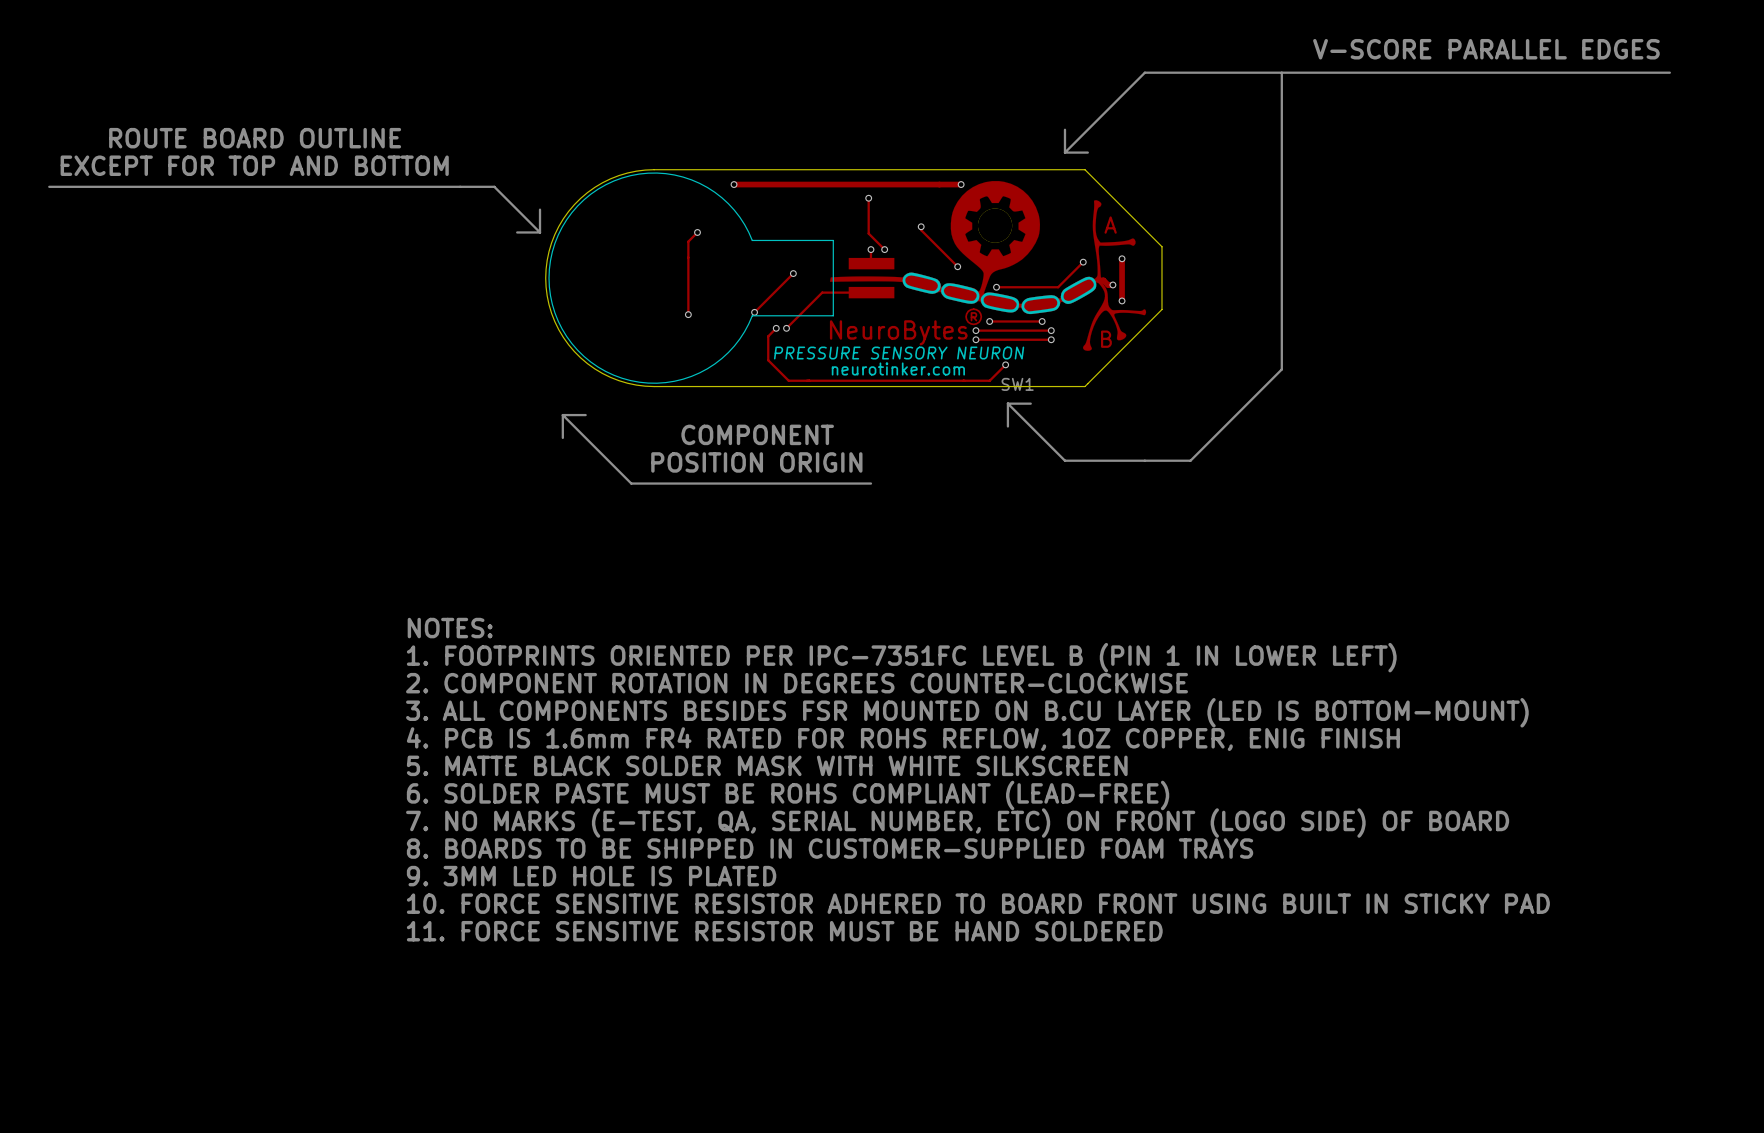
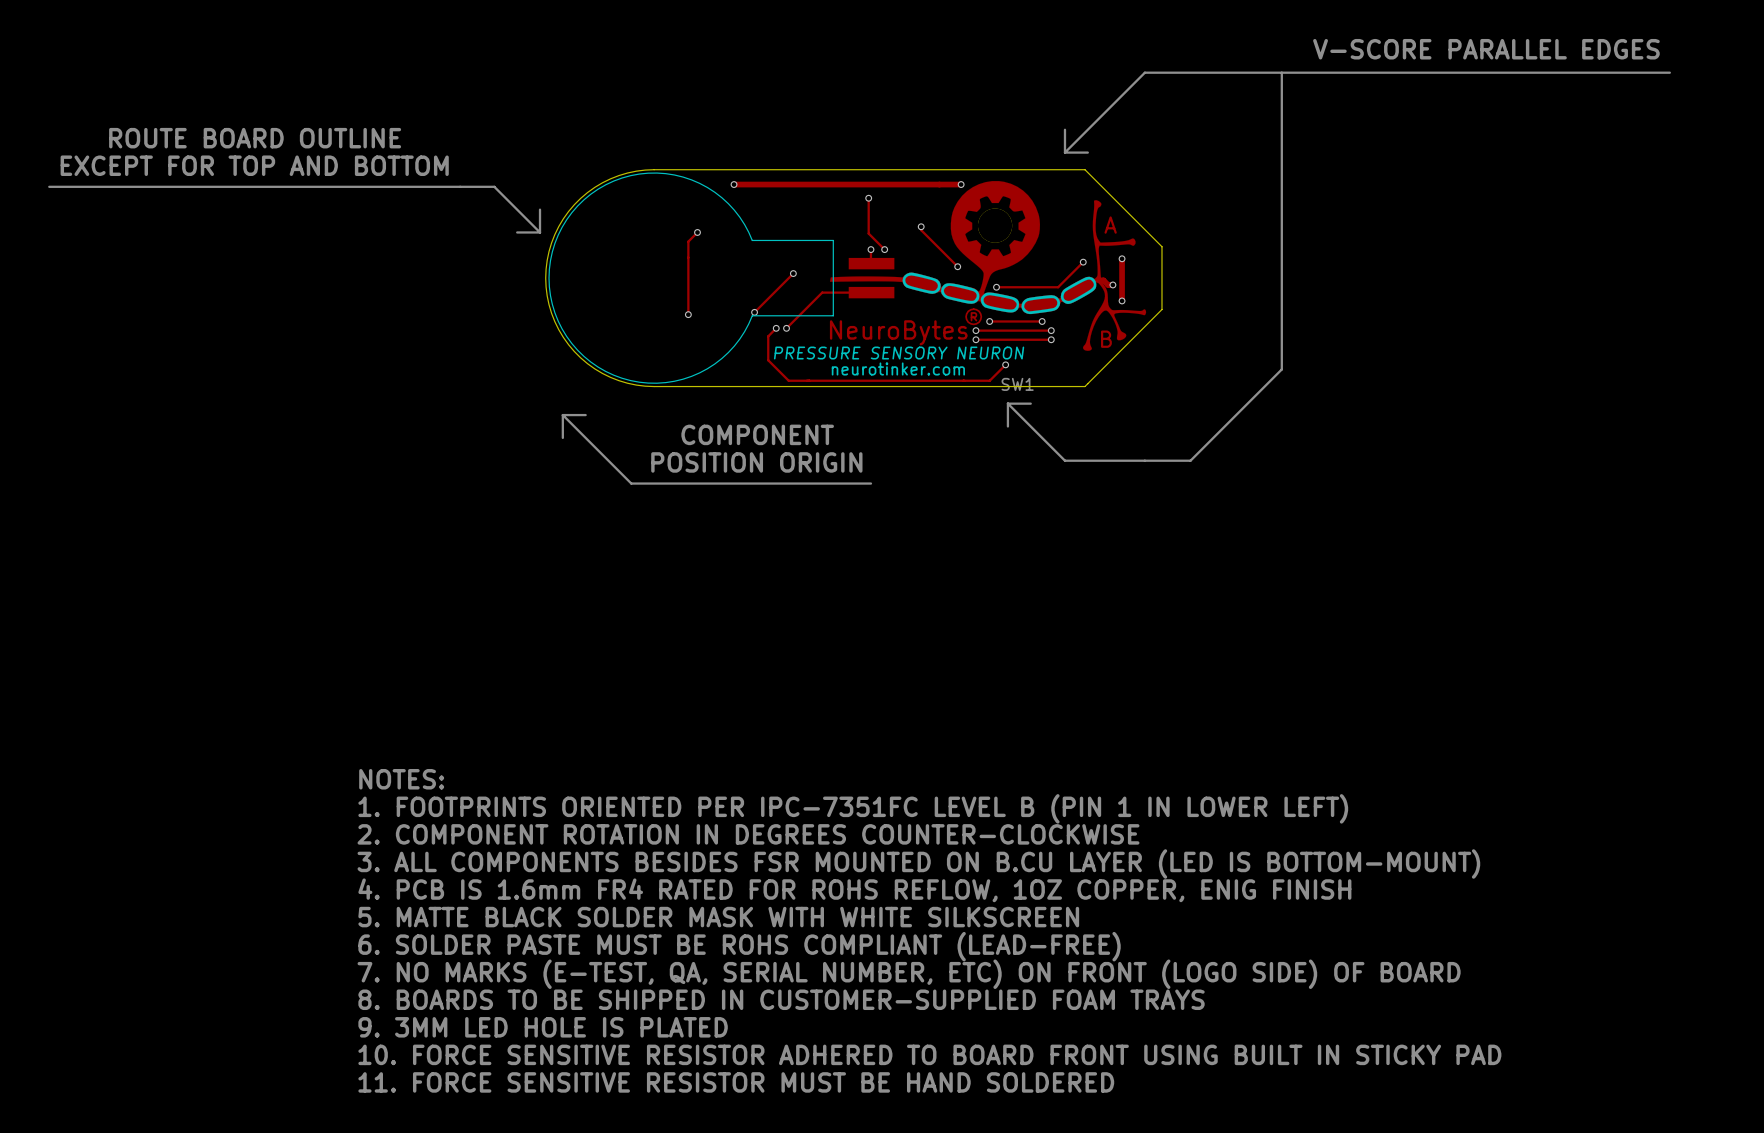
text position: NOTES: (450, 628) -> NOTES: (401, 779)
text position: 1. FOOTPRINTS ORIENTED PER IPC-7351FC LEVEL B (PIN 1 IN LOWER LEFT) (901, 657) -> 1. FOOTPRINTS ORIENTED PER IPC-7351FC LEVEL B (PIN 1 IN LOWER LEFT) (853, 808)
text position: 2. COMPONENT ROTATION IN DEGREES COUNTER-CLOCKWISE (797, 683) -> 2. COMPONENT ROTATION IN DEGREES COUNTER-CLOCKWISE (748, 834)
text position: 3. ALL COMPONENTS BESIDES FSR MOUNTED ON B.CU LAYER (LED IS BOTTOM-MOUNT) (967, 712) -> 3. ALL COMPONENTS BESIDES FSR MOUNTED ON B.CU LAYER (LED IS BOTTOM-MOUNT) (918, 863)
text position: 4. PCB IS 1.6mm FR4 RATED FOR ROHS REFLOW, 1OZ COPPER, ENIG FINISH (903, 739) -> 4. PCB IS 1.6mm FR4 RATED FOR ROHS REFLOW, 1OZ COPPER, ENIG FINISH (854, 890)
text position: 5. MATTE BLACK SOLDER MASK WITH WHITE SILKSCREEN (767, 765) -> 5. MATTE BLACK SOLDER MASK WITH WHITE SILKSCREEN (718, 917)
text position: 6. SOLDER PASTE MUST BE ROHS COMPLIANT (LEAD-FREE) (788, 795) -> 6. SOLDER PASTE MUST BE ROHS COMPLIANT (LEAD-FREE) (739, 946)
text position: 7. NO MARKS (E-TEST, QA, SERIAL NUMBER, ETC) ON FRONT (LOGO SIDE) OF BOARD (957, 823) -> 7. NO MARKS (E-TEST, QA, SERIAL NUMBER, ETC) ON FRONT (LOGO SIDE) OF BOARD (909, 974)
text position: 8. BOARDS TO BE SHIPPED IN CUSTOMER-SUPPLIED FOAM TRAYS (830, 848) -> 8. BOARDS TO BE SHIPPED IN CUSTOMER-SUPPLIED FOAM TRAYS (781, 999)
text position: 9. 3MM LED HOLE IS PLATED (591, 876) -> 9. 3MM LED HOLE IS PLATED (543, 1027)
text position: 10. FORCE SENSITIVE RESISTOR ADHERED TO BOARD FRONT USING BUILT IN STICKY PAD (978, 903) -> 10. FORCE SENSITIVE RESISTOR ADHERED TO BOARD FRONT USING BUILT IN STICKY PAD (929, 1054)
text position: 11. FORCE SENSITIVE RESISTOR MUST BE HAND SOLDERED (784, 931) -> 11. FORCE SENSITIVE RESISTOR MUST BE HAND SOLDERED (736, 1082)

